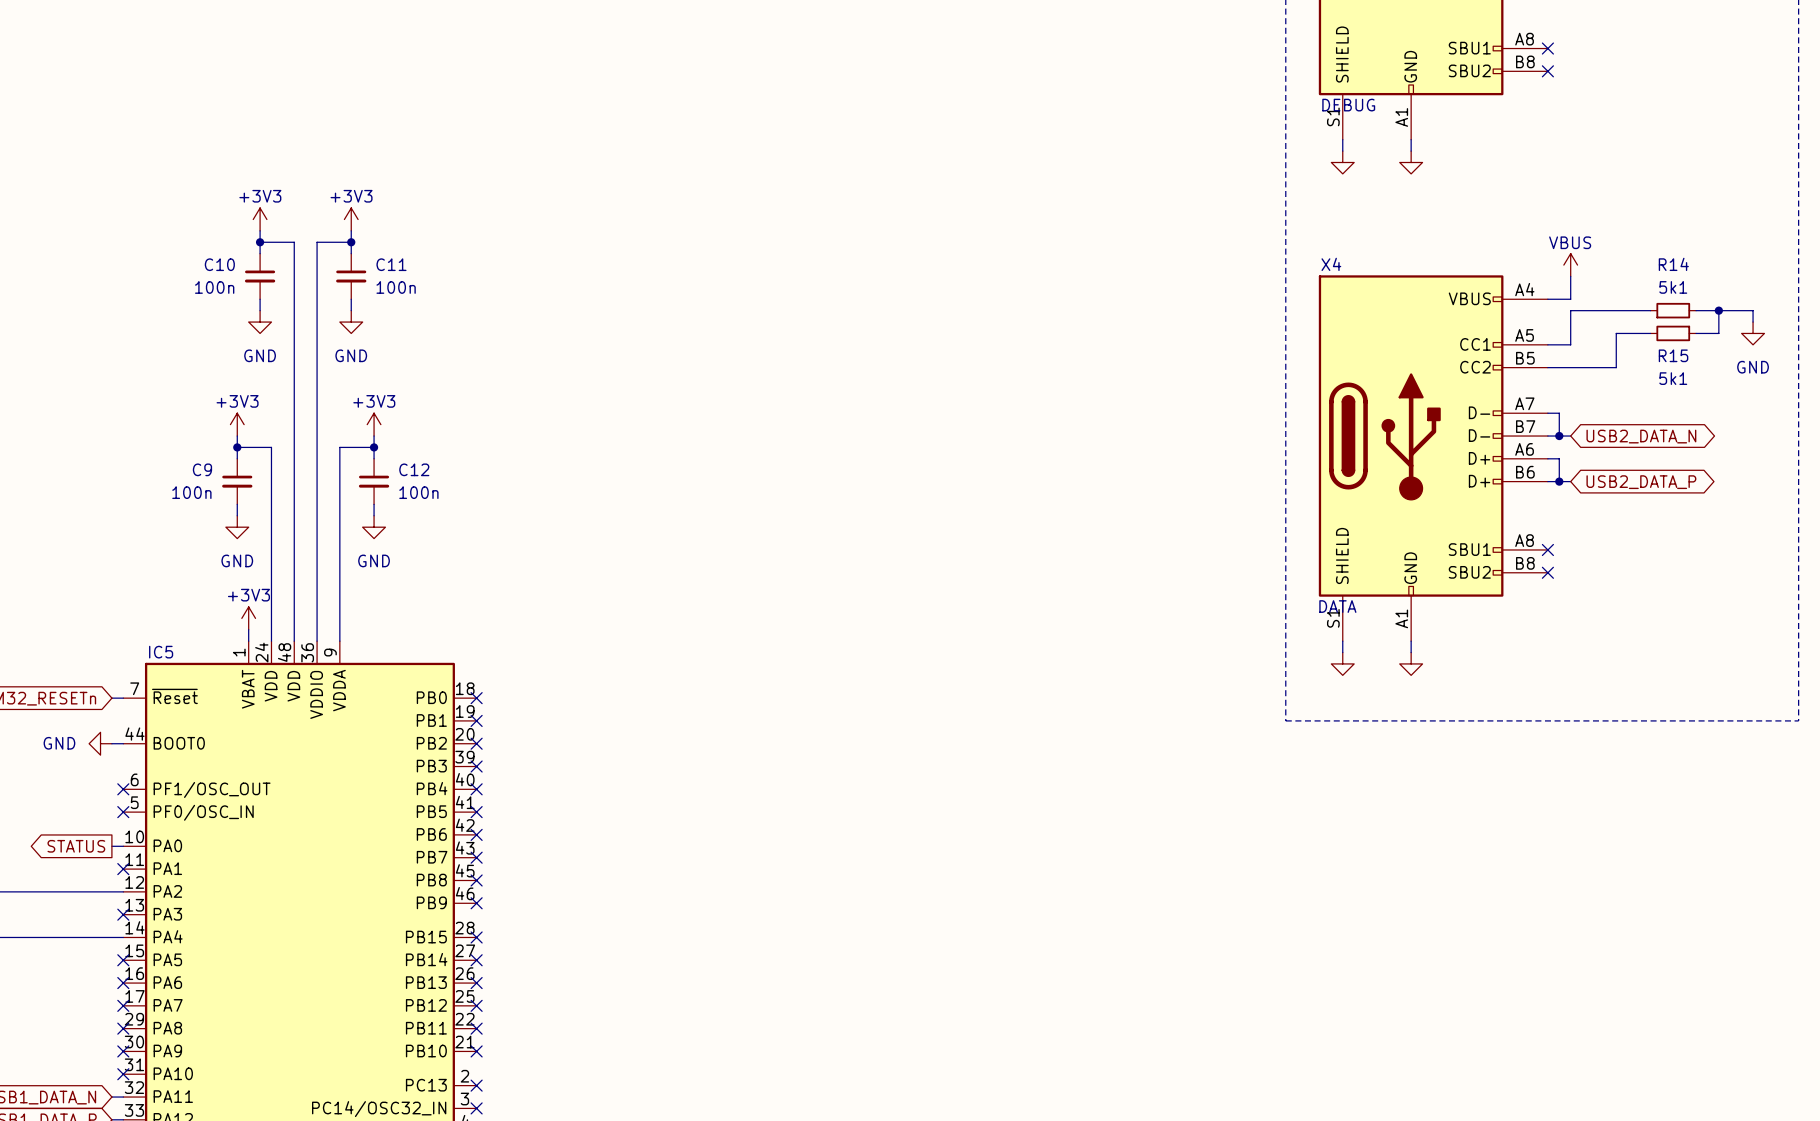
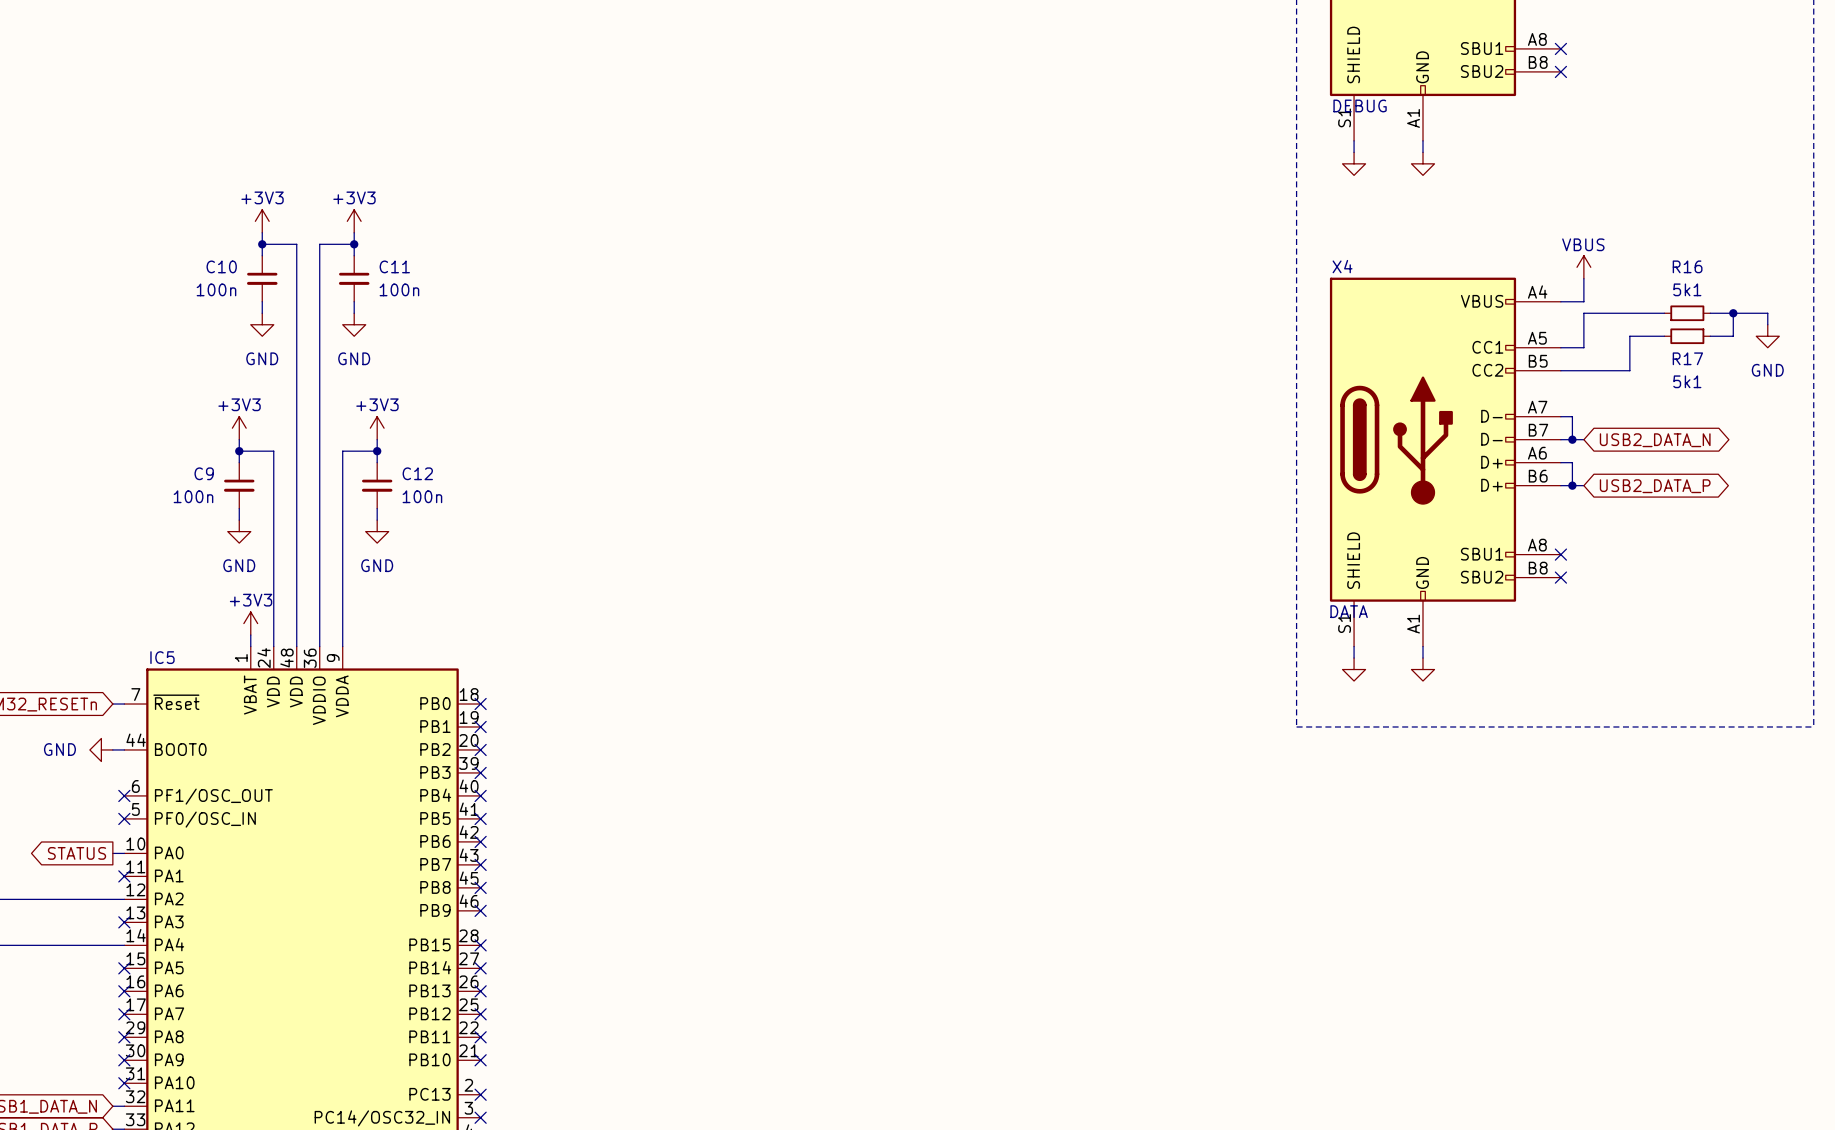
R14 name: R14 (1673, 264) -> R16 (1687, 266)
R15 name: R15 (1673, 355) -> R17 (1687, 358)

